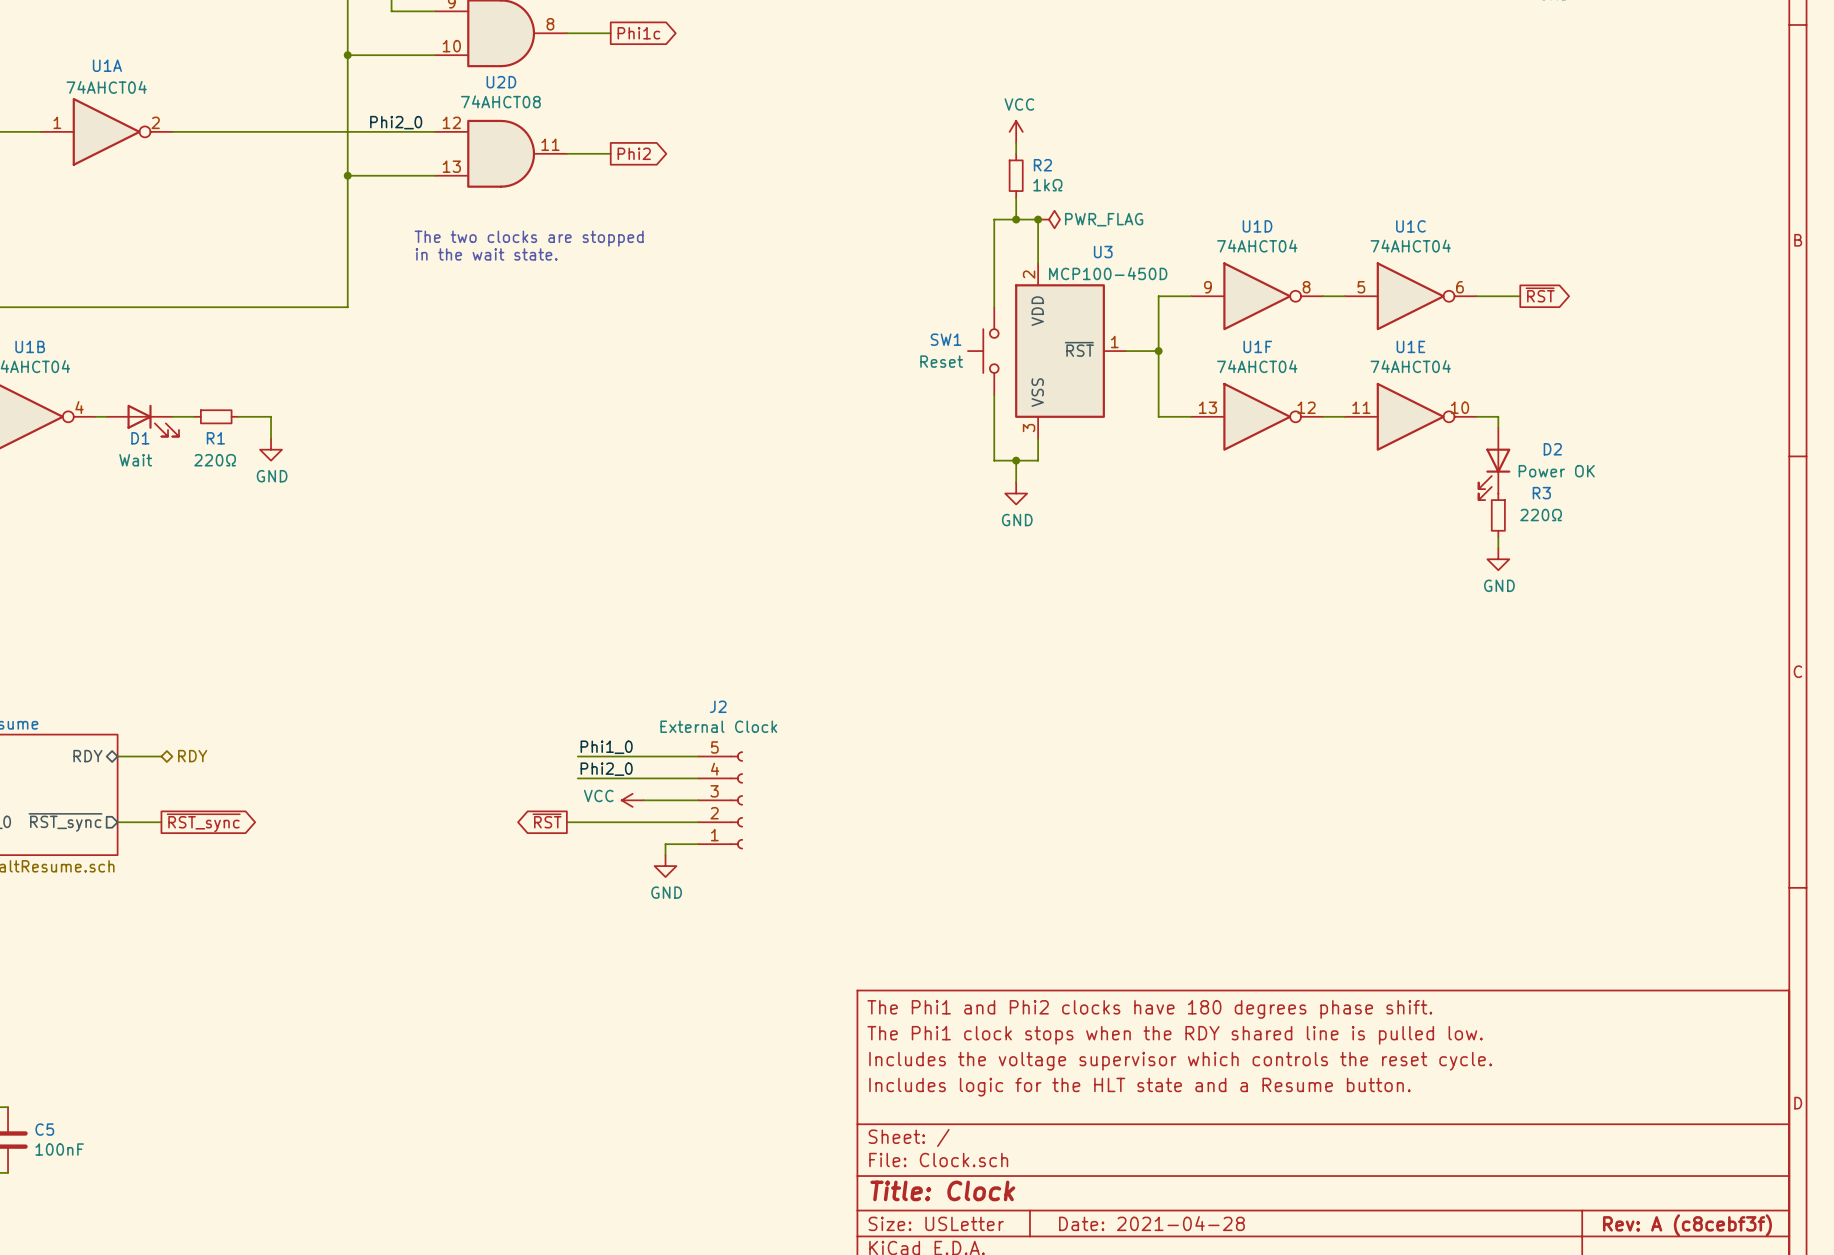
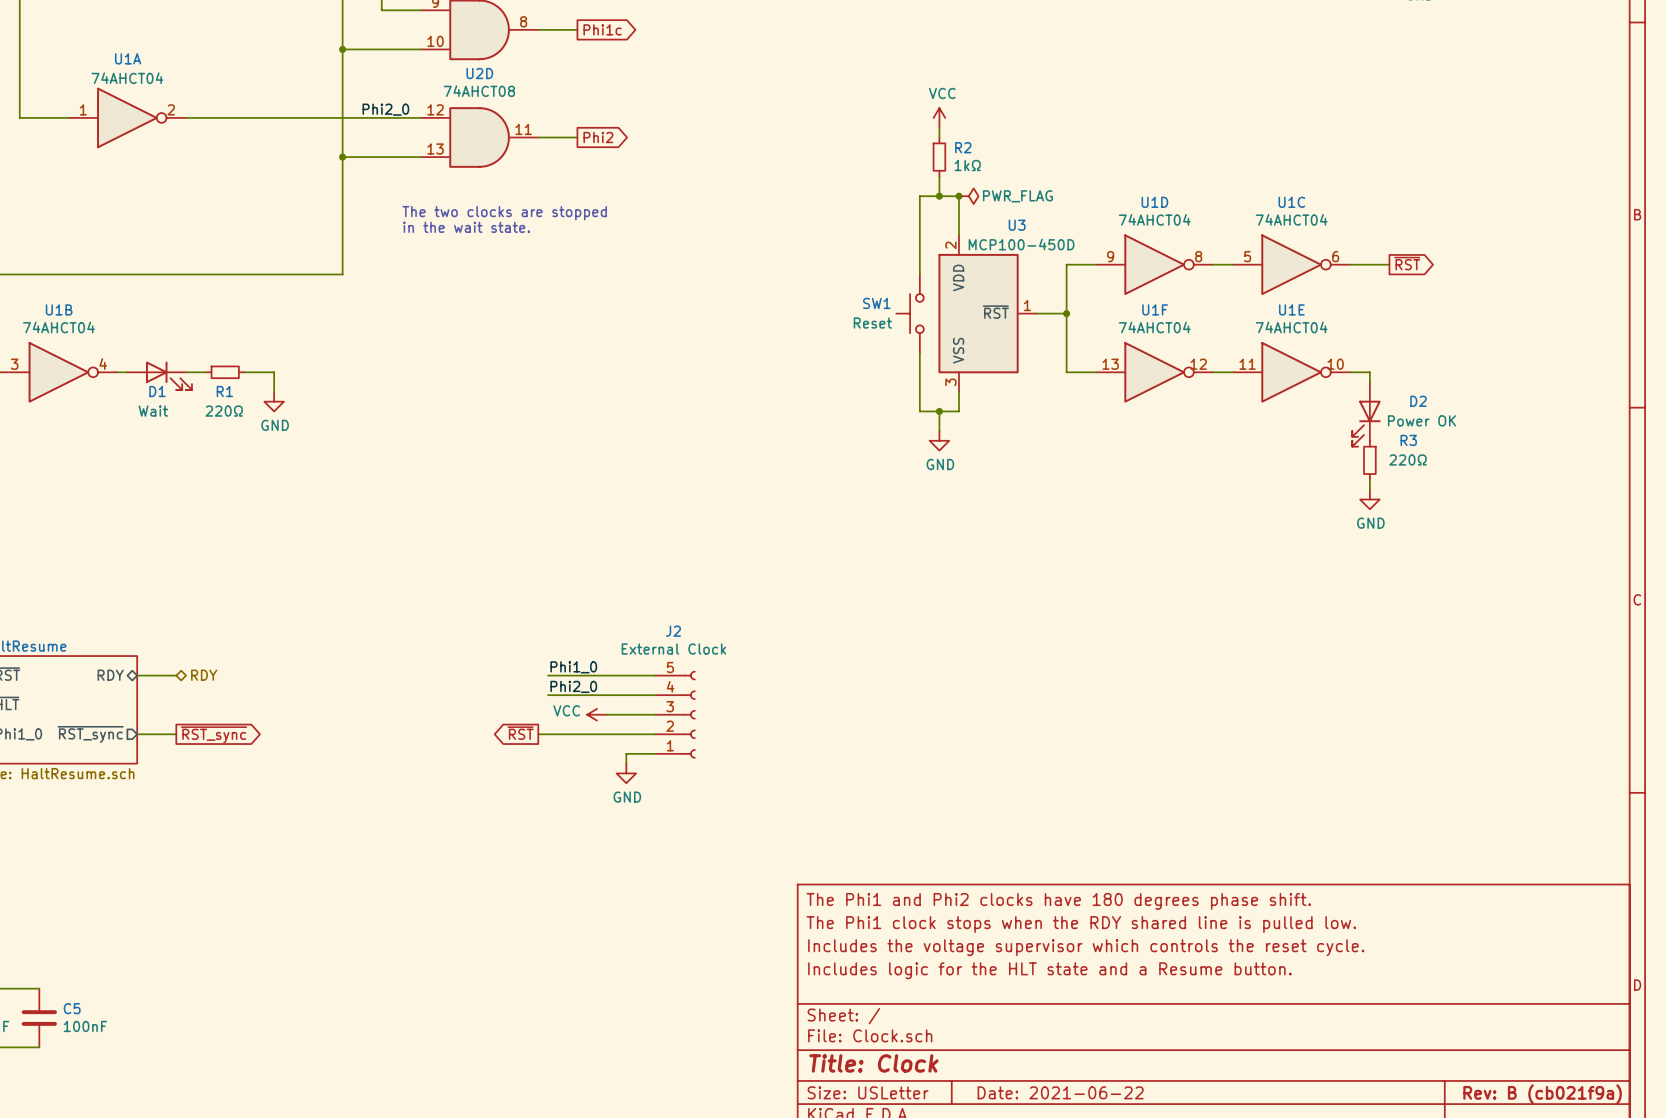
title block: Date: 2021-04-28 (1151, 1223) -> Date: 2021-06-22 (1060, 1092)
title block: Rev: A (c8cebf3f) (1687, 1225) -> Rev: B (cb021f9a) (1542, 1094)

